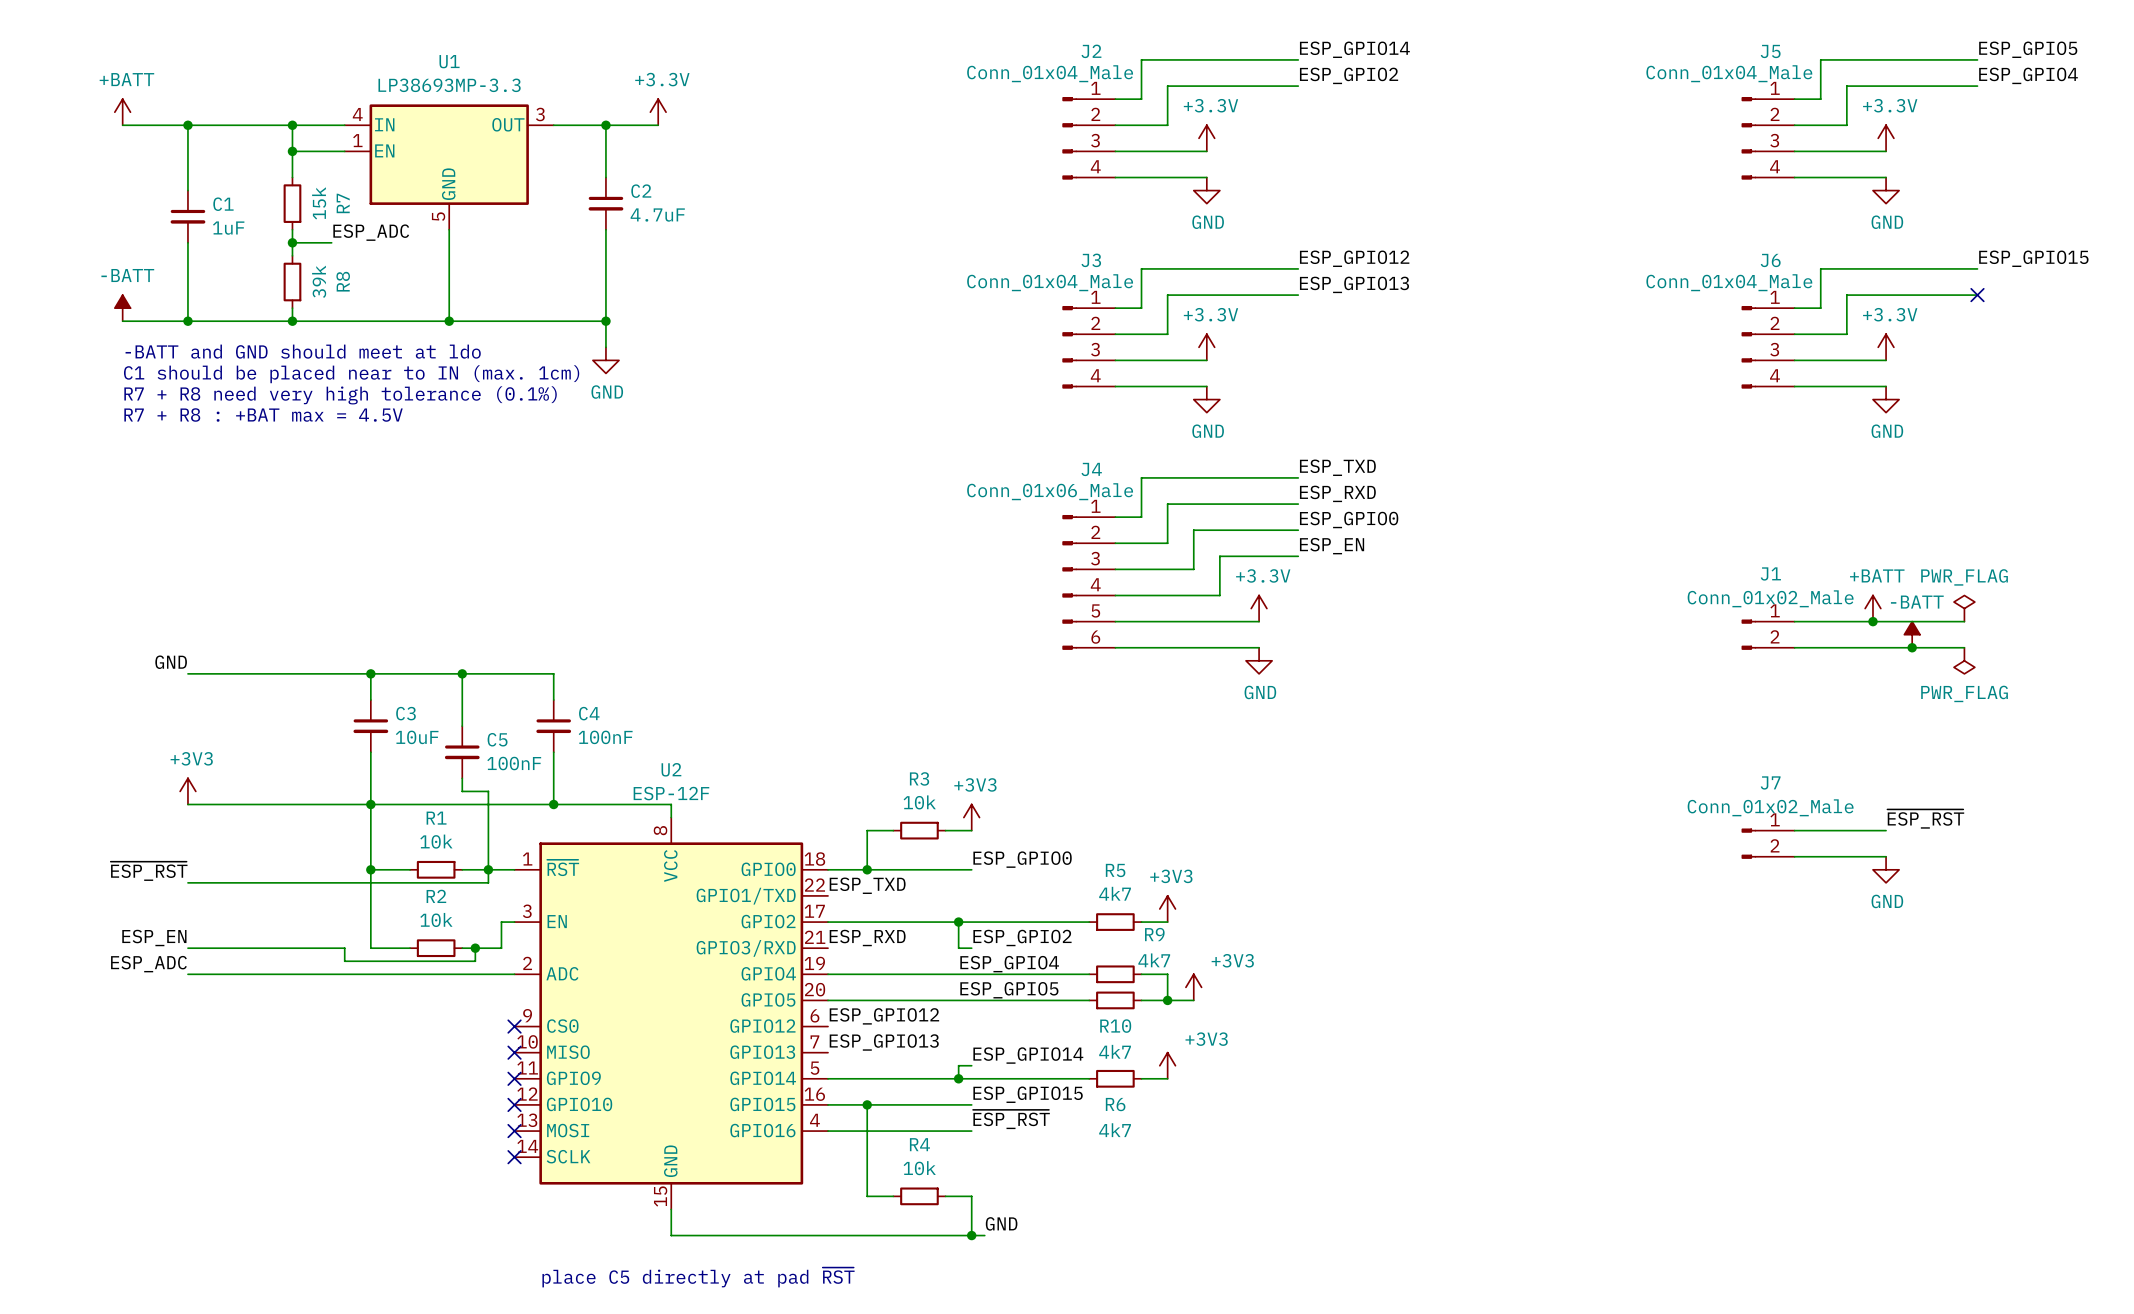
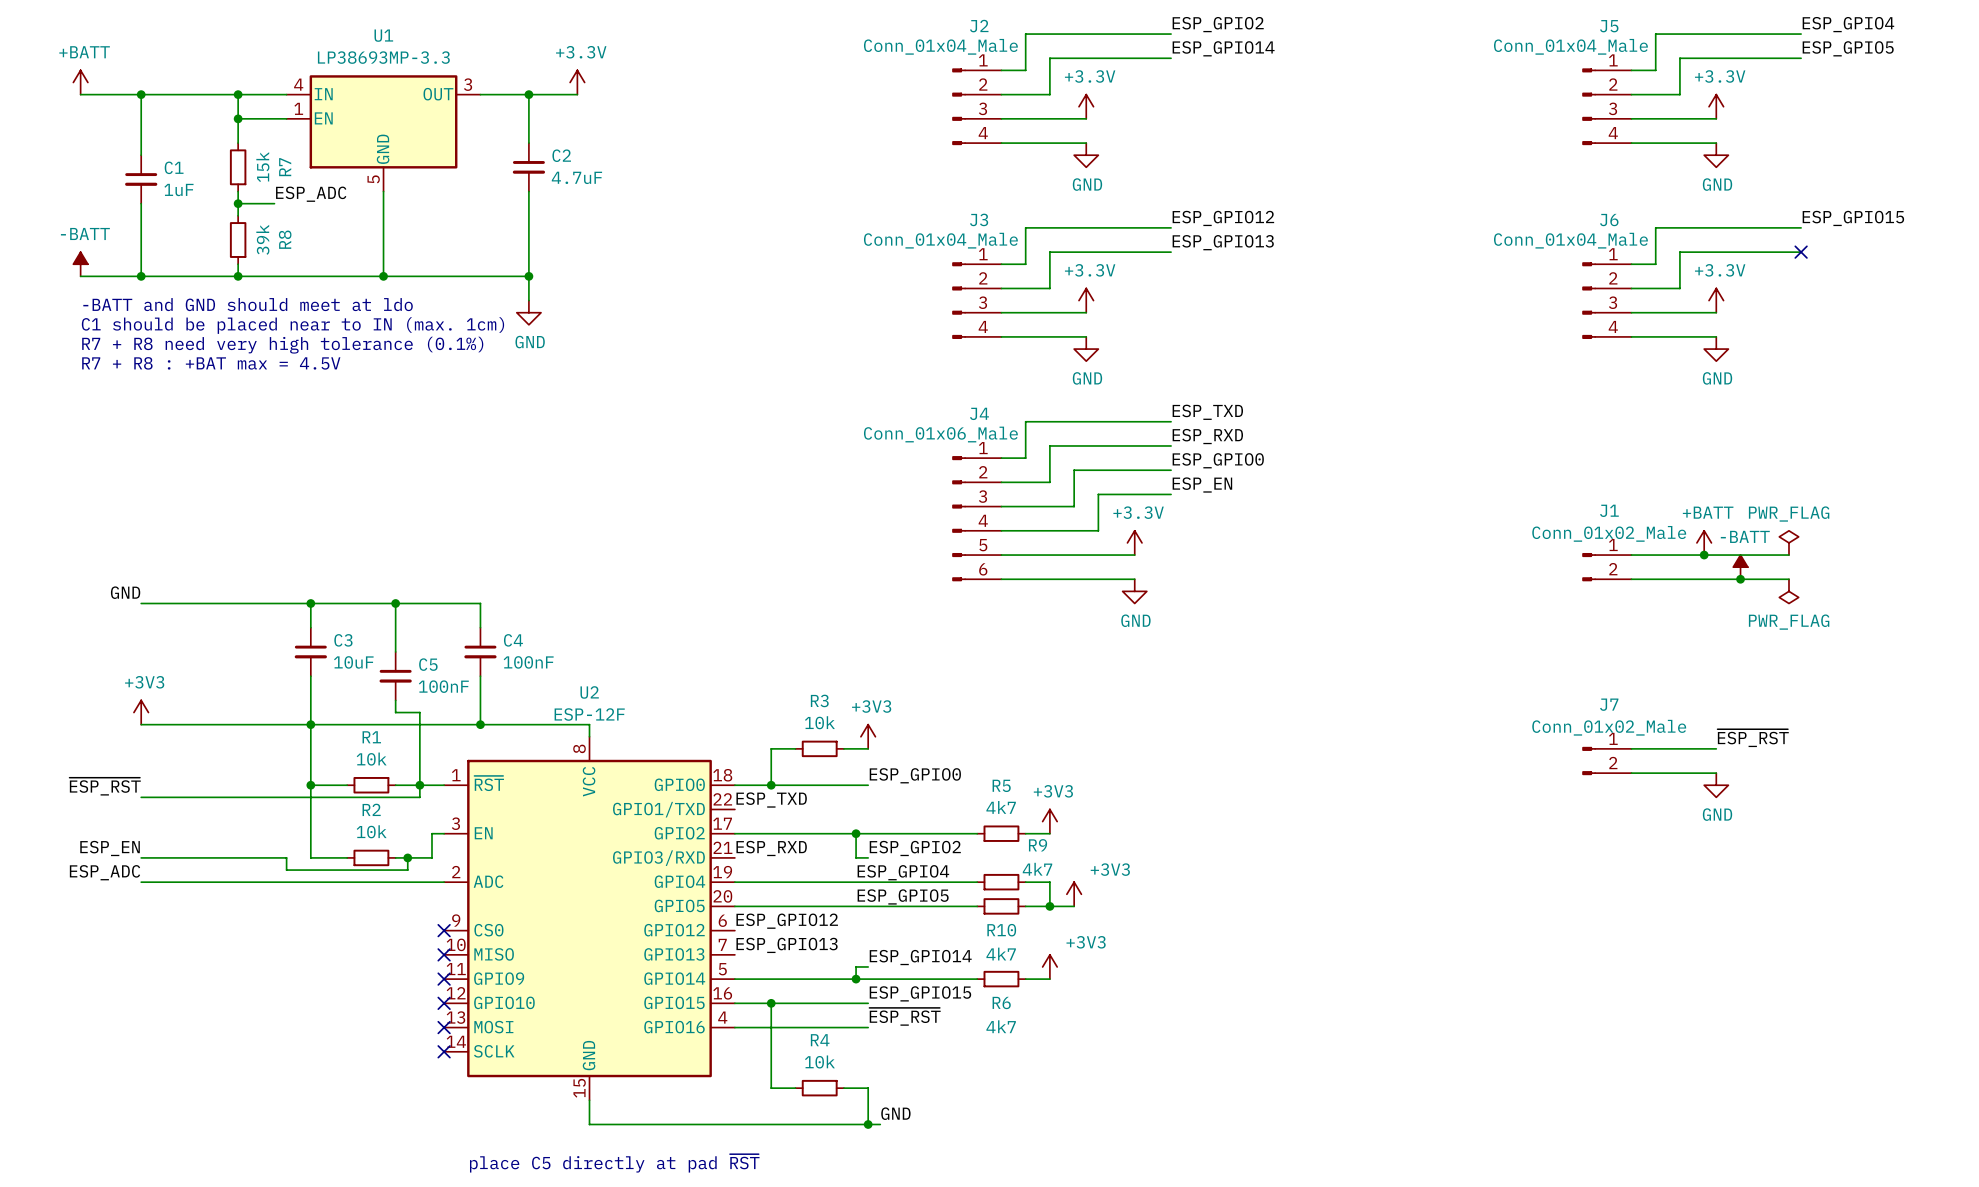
label: ESP_GPIO14 (1354, 49) -> ESP_GPIO2 (1218, 24)
label: ESP_GPIO5 (2028, 49) -> ESP_GPIO4 (1848, 24)
label: ESP_GPIO2 (1349, 75) -> ESP_GPIO14 (1223, 48)
label: ESP_GPIO4 (2028, 75) -> ESP_GPIO5 (1848, 48)

